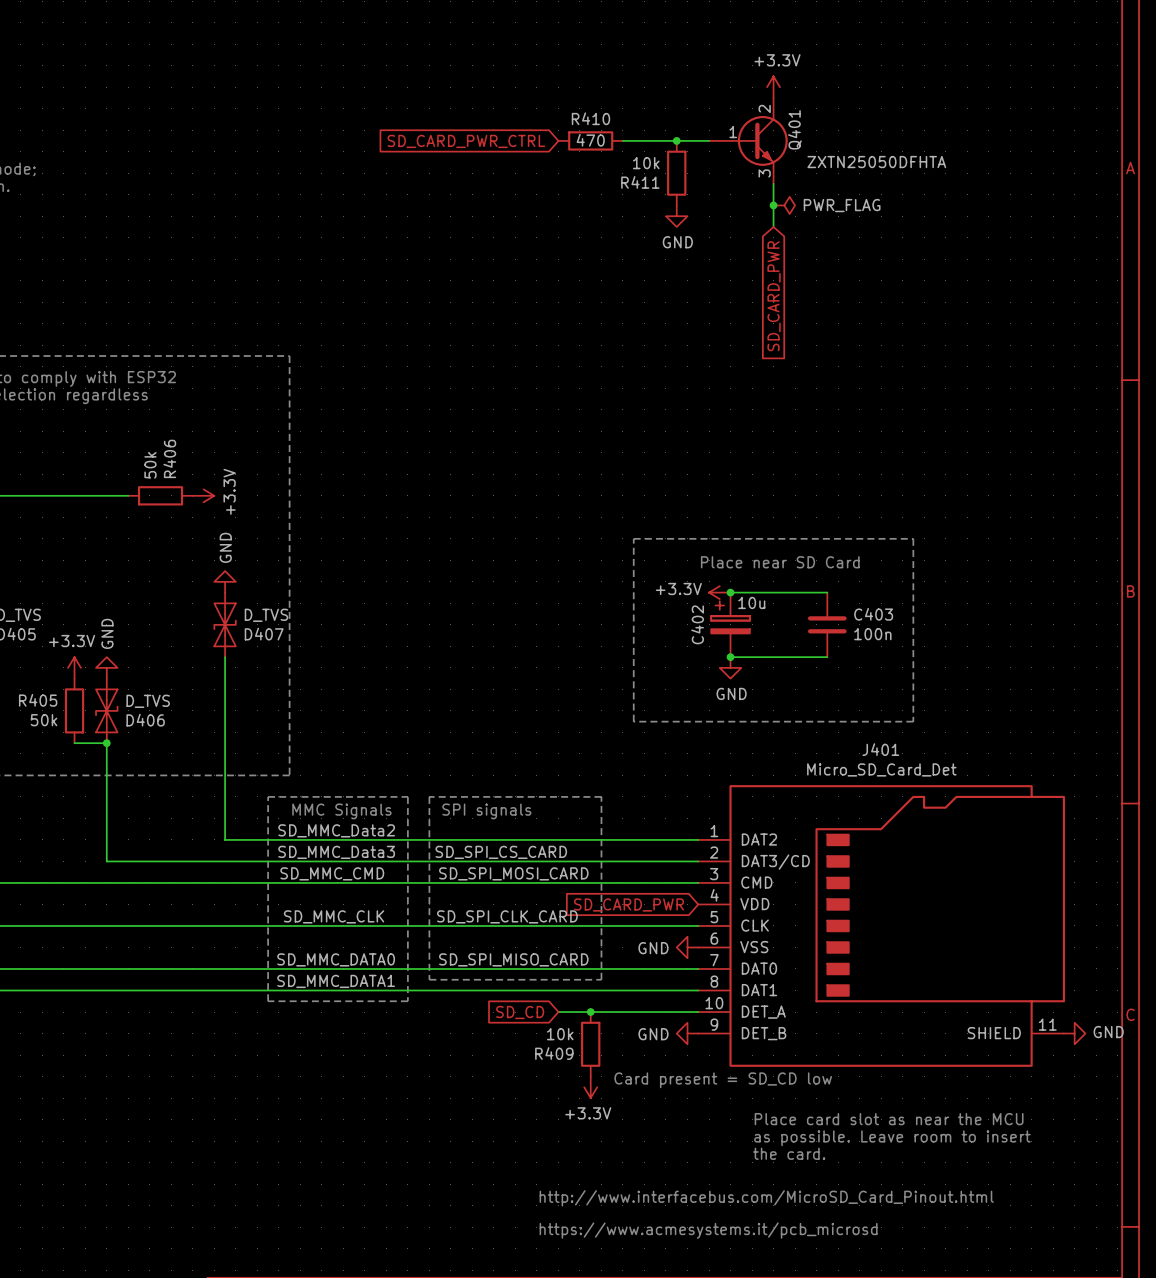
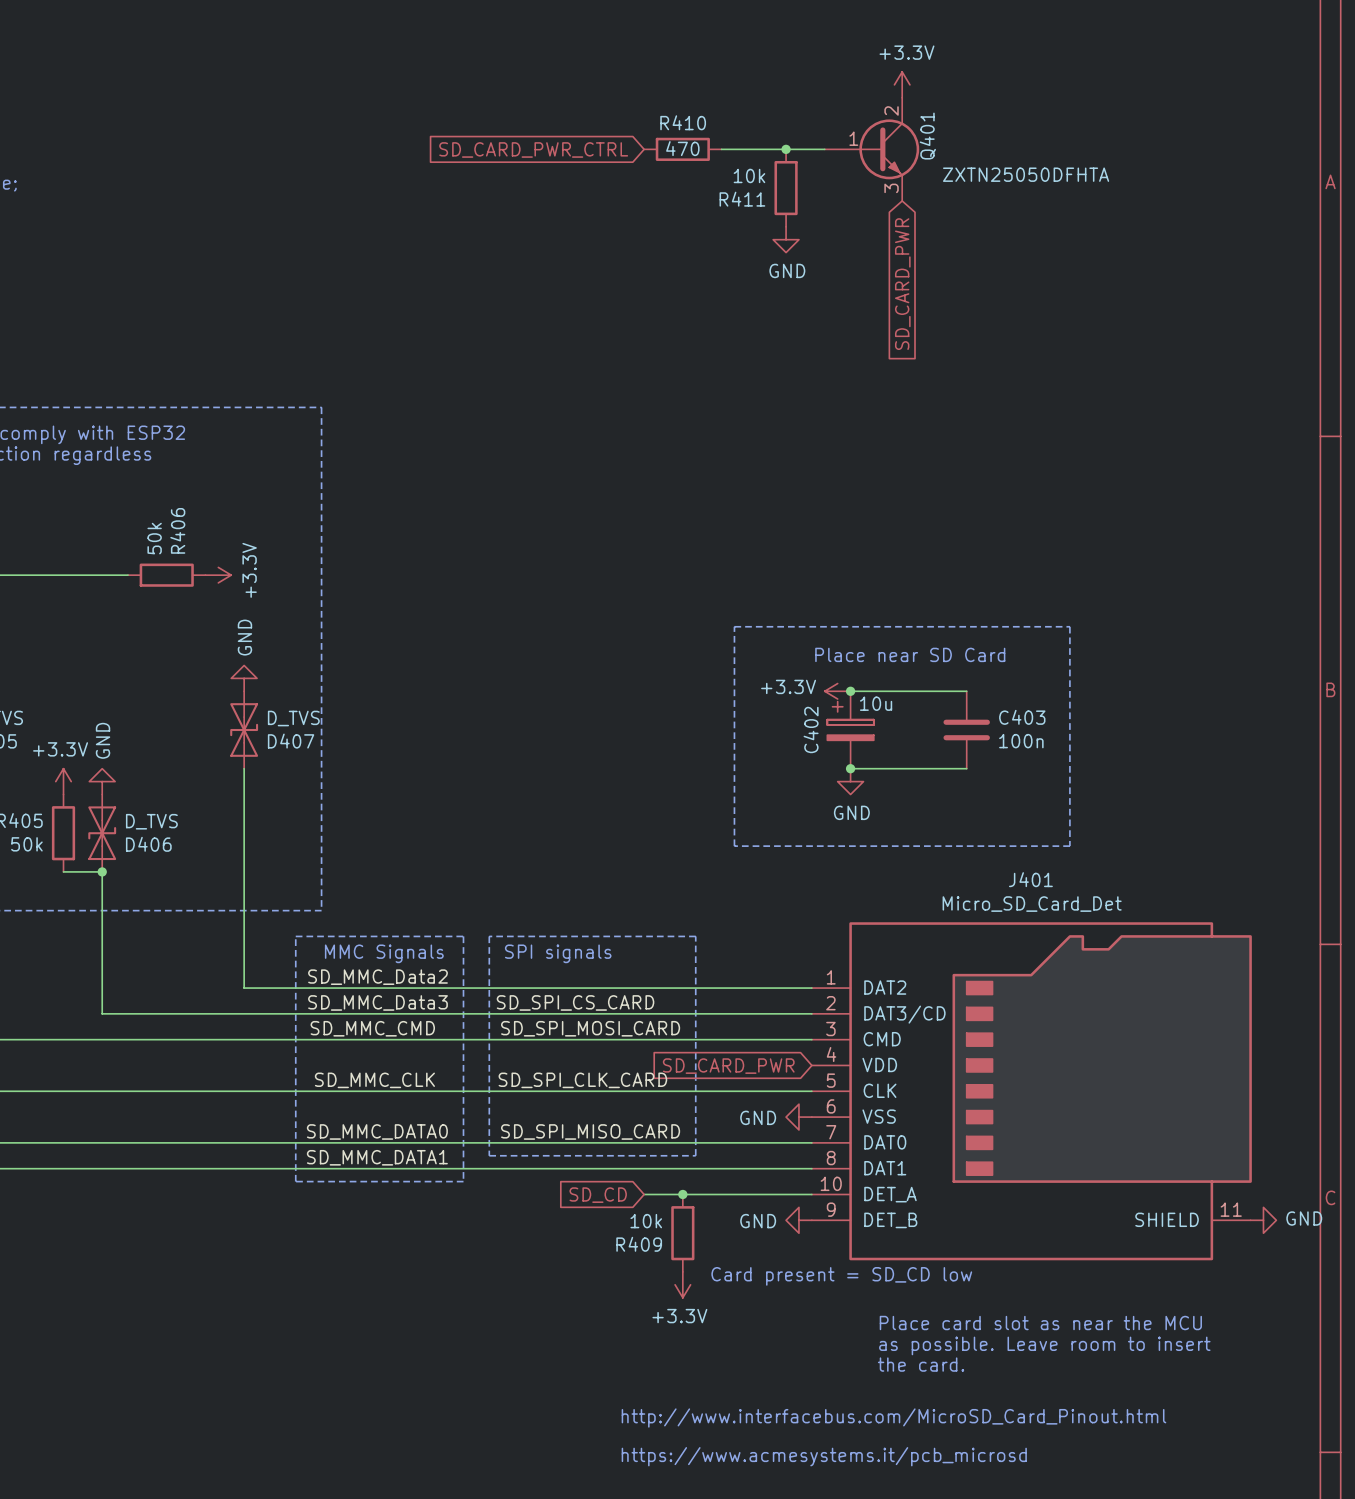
wire: (773, 183) (773, 226) -> none
junction: (773, 205) -> none
power symbol: PWR_FLAG (784, 205) -> none
global label position: SD_CARD_PWR (774, 296) -> SD_CARD_PWR (902, 284)

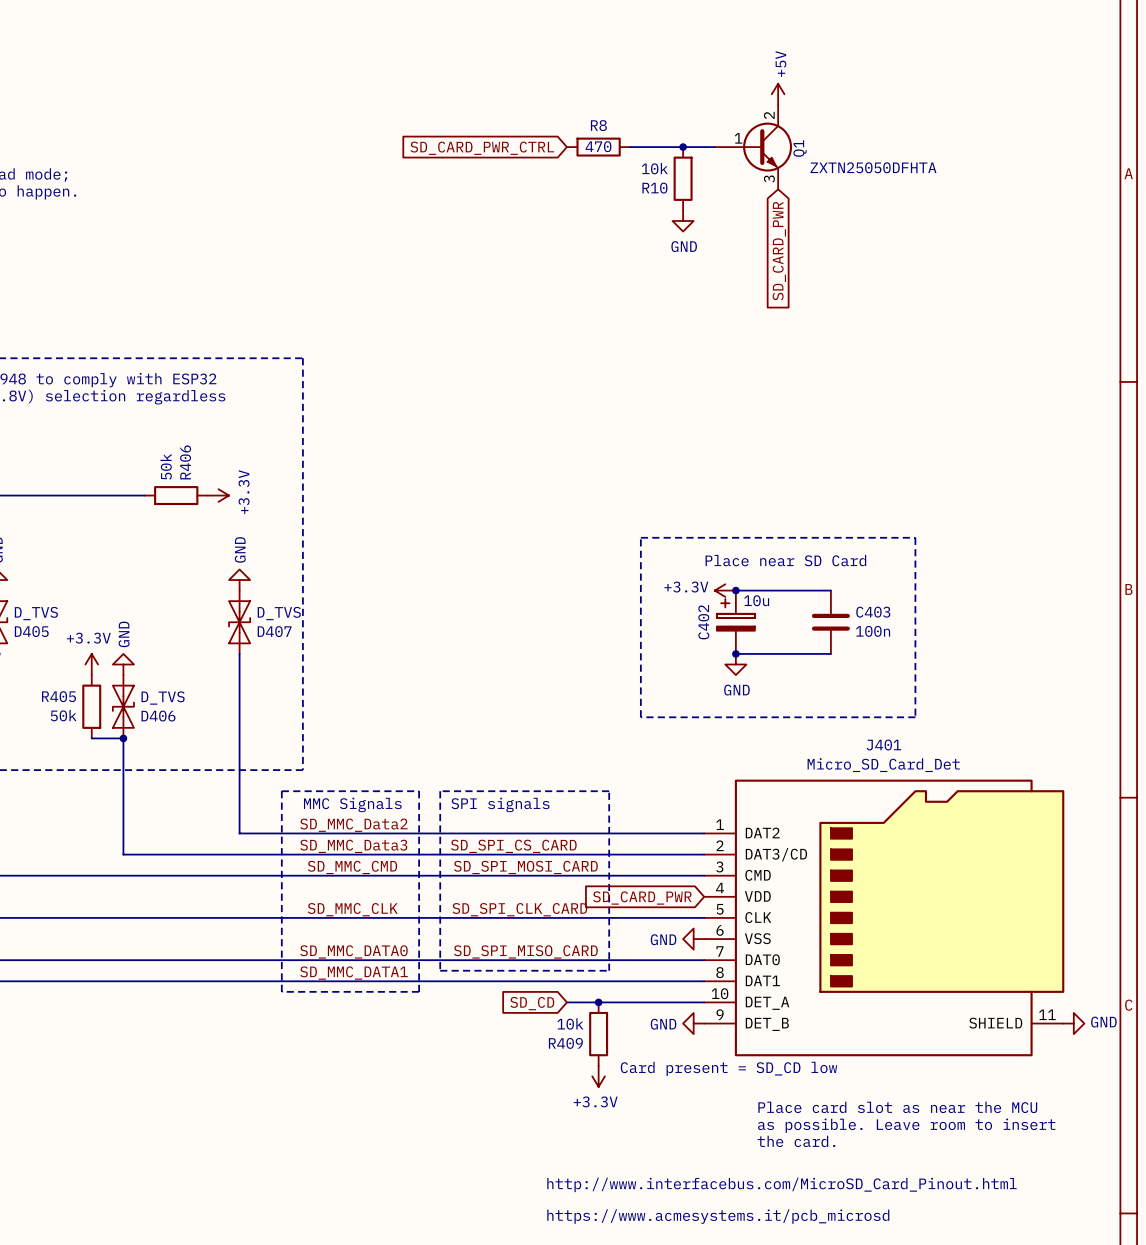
power symbol: +3.3V (902, 84) -> +5V (778, 94)
R410 name: R410 (683, 122) -> R8 (598, 125)
Q401 name: Q401 (927, 136) -> Q1 (800, 148)
R411 name: R411 (742, 199) -> R10 (654, 188)

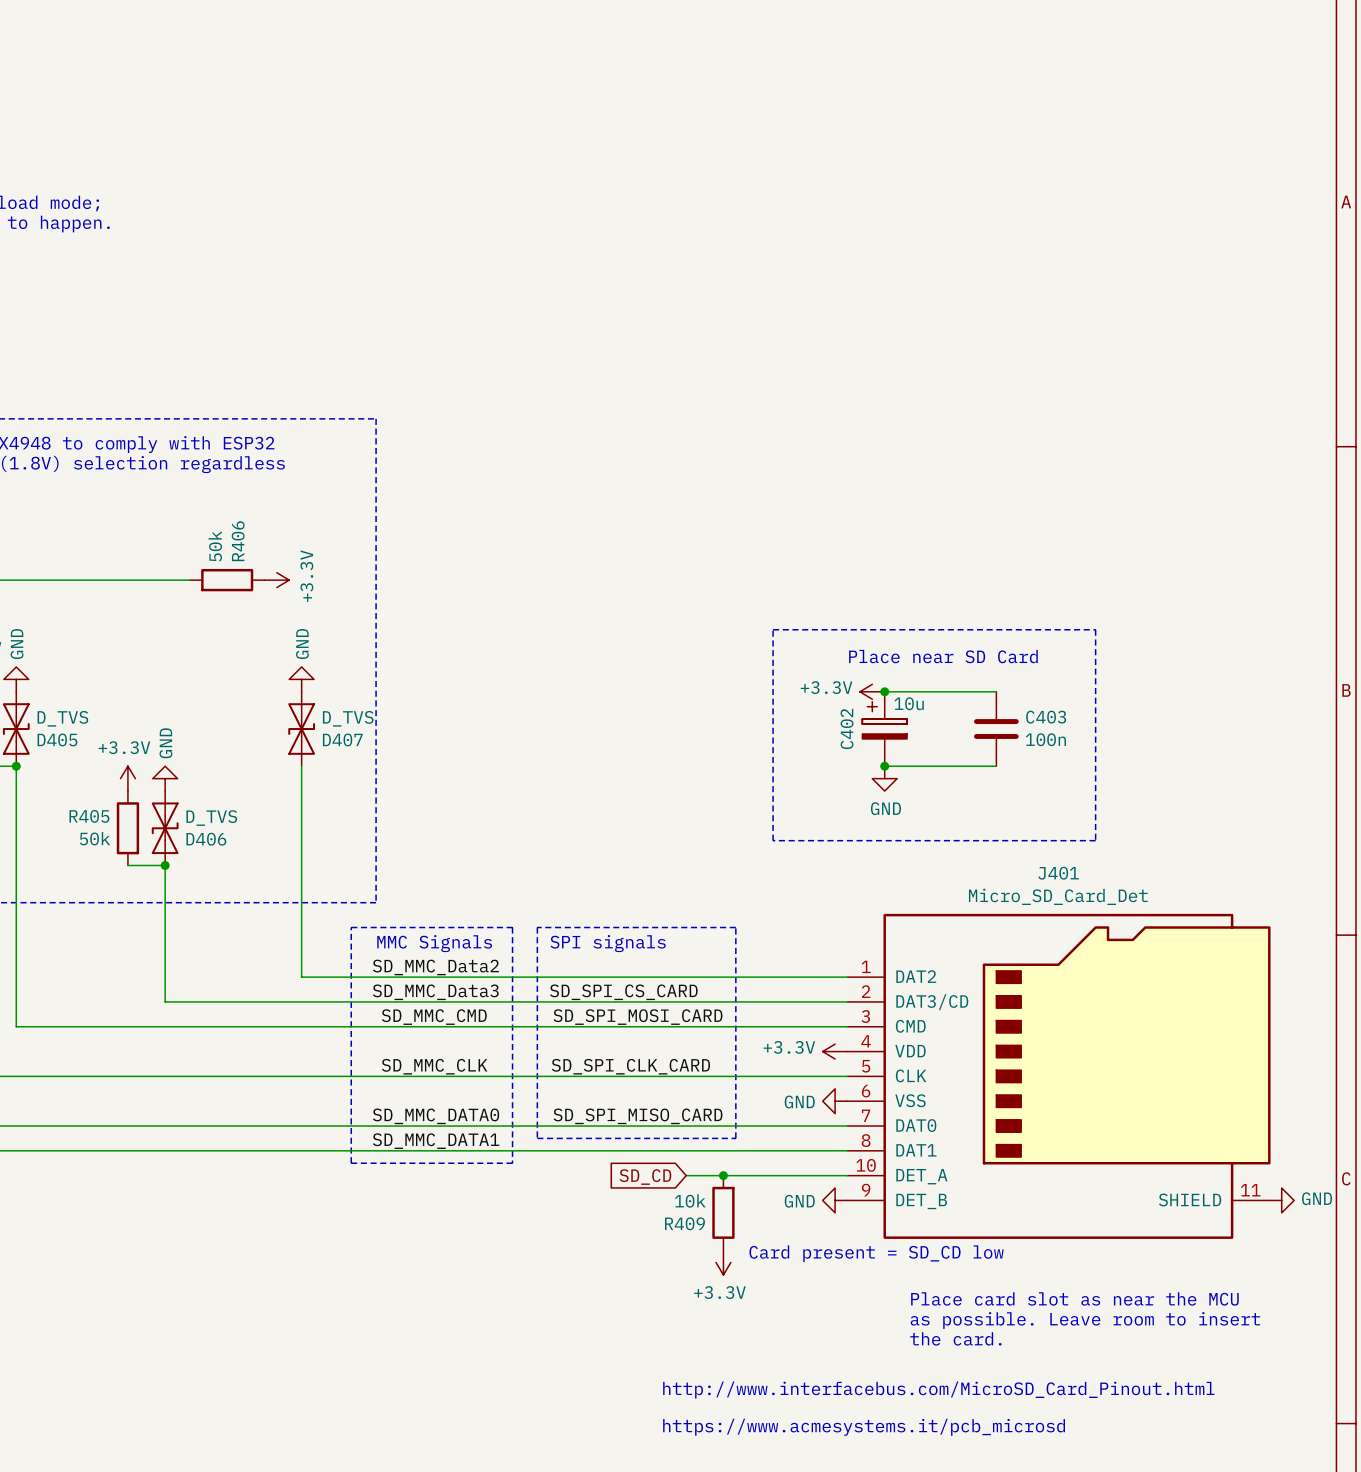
power symbol: +5V (778, 94) -> none
R8: 470 (598, 147) -> none
wire: (630, 147) (714, 147) -> none
junction: (683, 147) -> none
Q1: ZXTN25050DFHTA (753, 147) -> none
global label: SD_CARD_PWR_CTRL (482, 148) -> none
R10: 10k (683, 178) -> none
power symbol: GND (683, 220) -> none
global label: SD_CARD_PWR (779, 251) -> none
power symbol: none -> +3.3V (835, 1051)
global label: SD_CARD_PWR (642, 898) -> none

